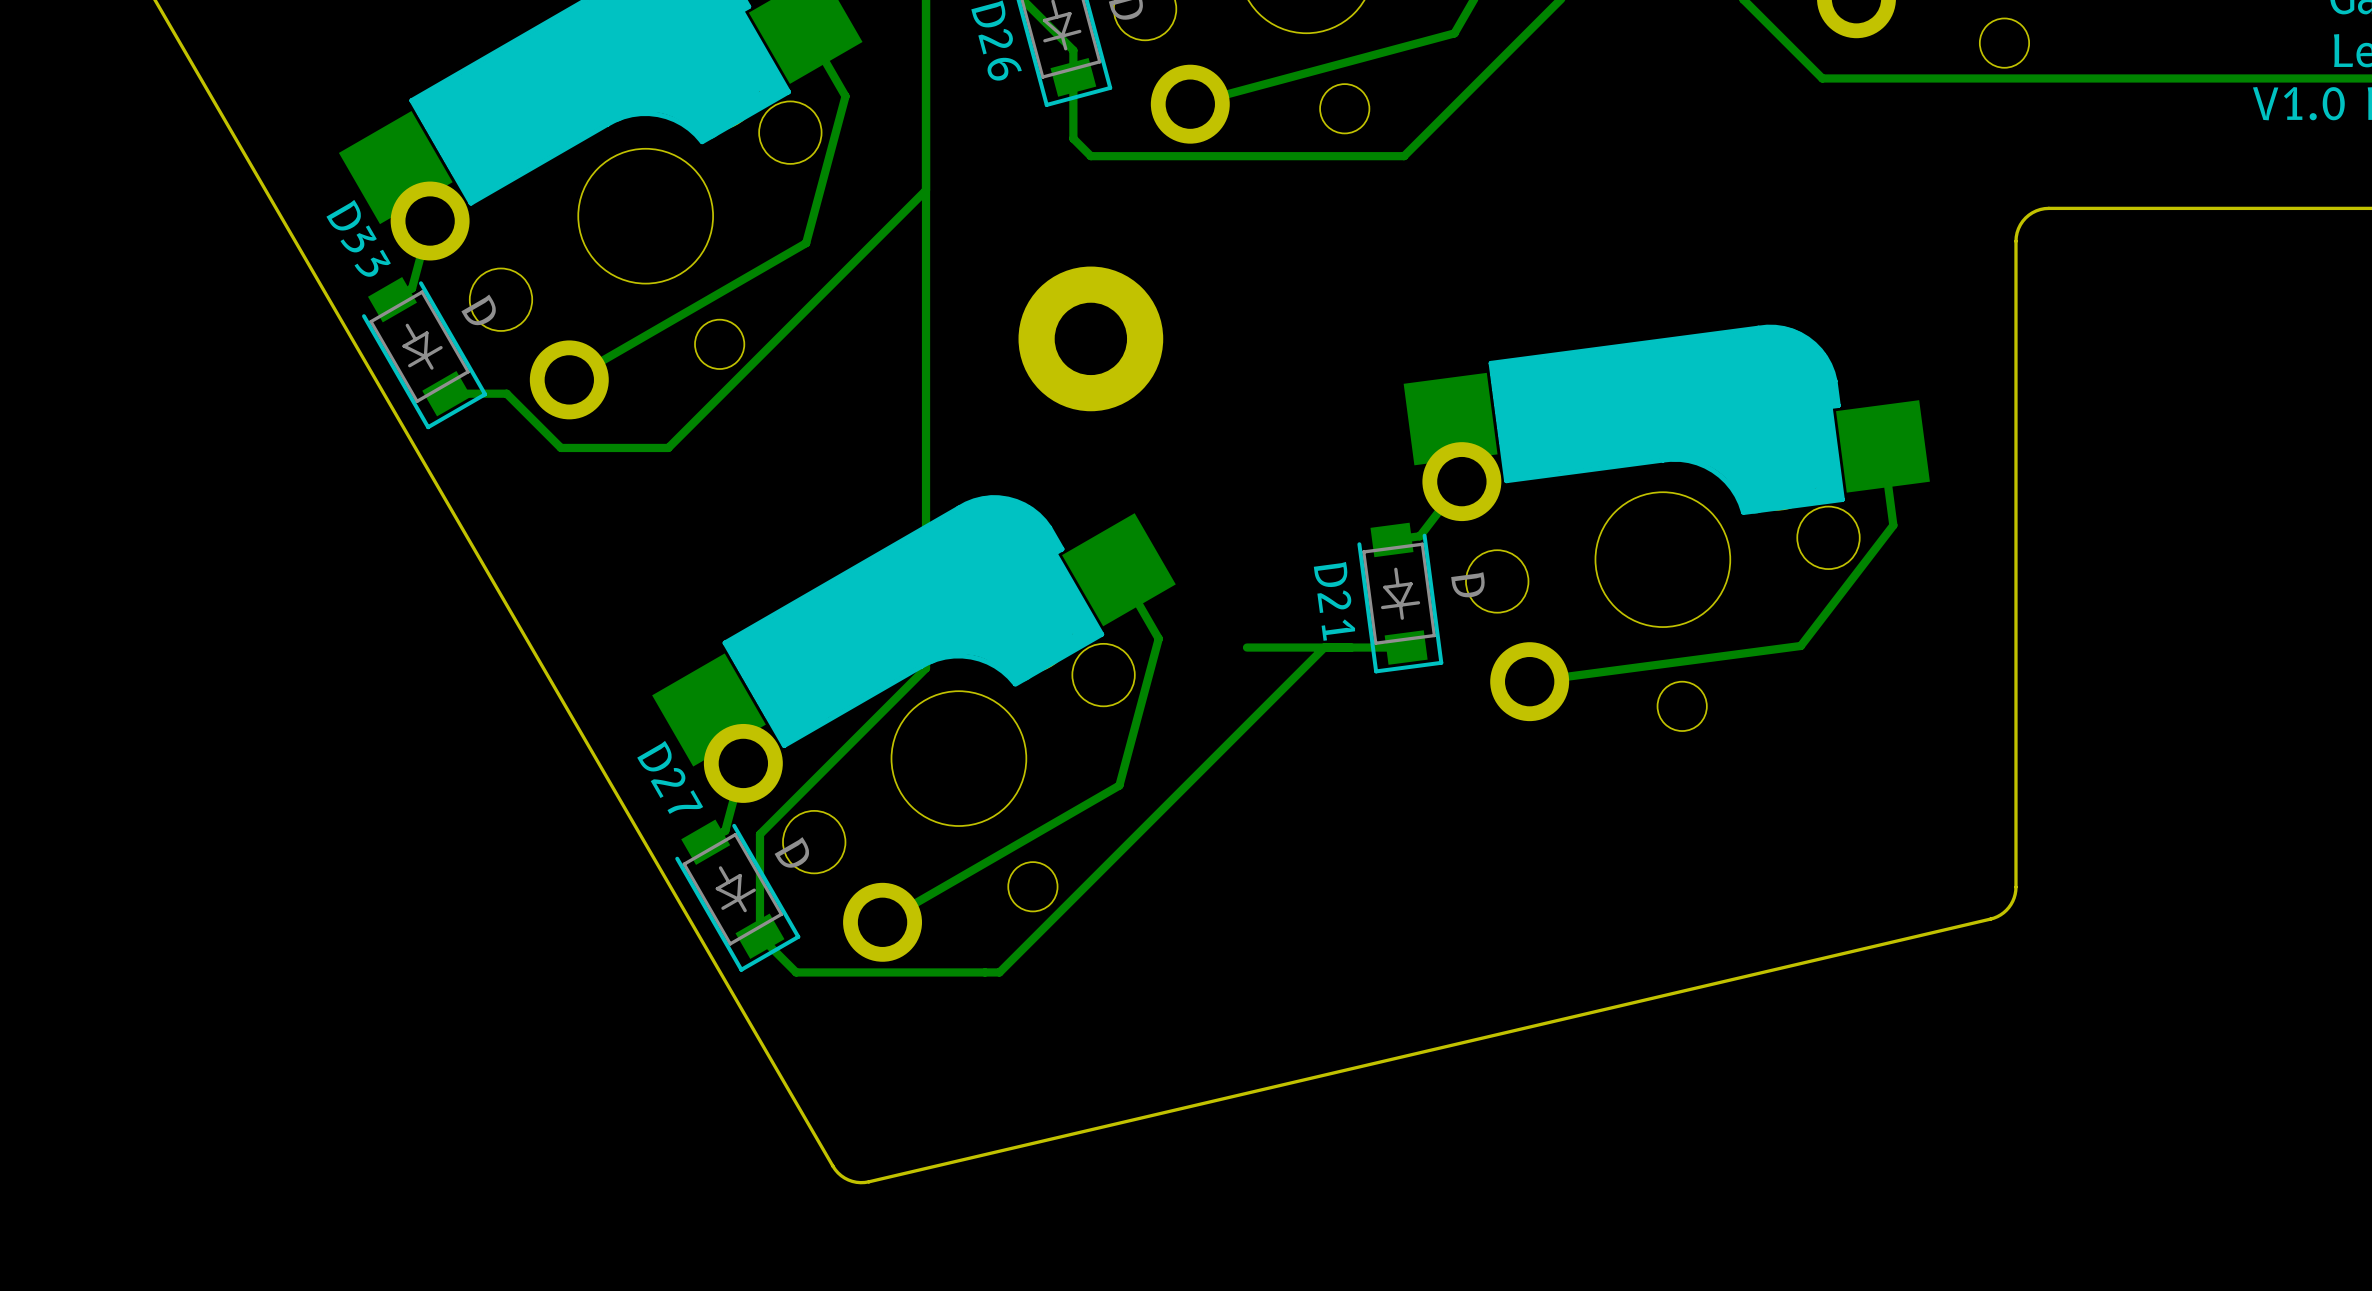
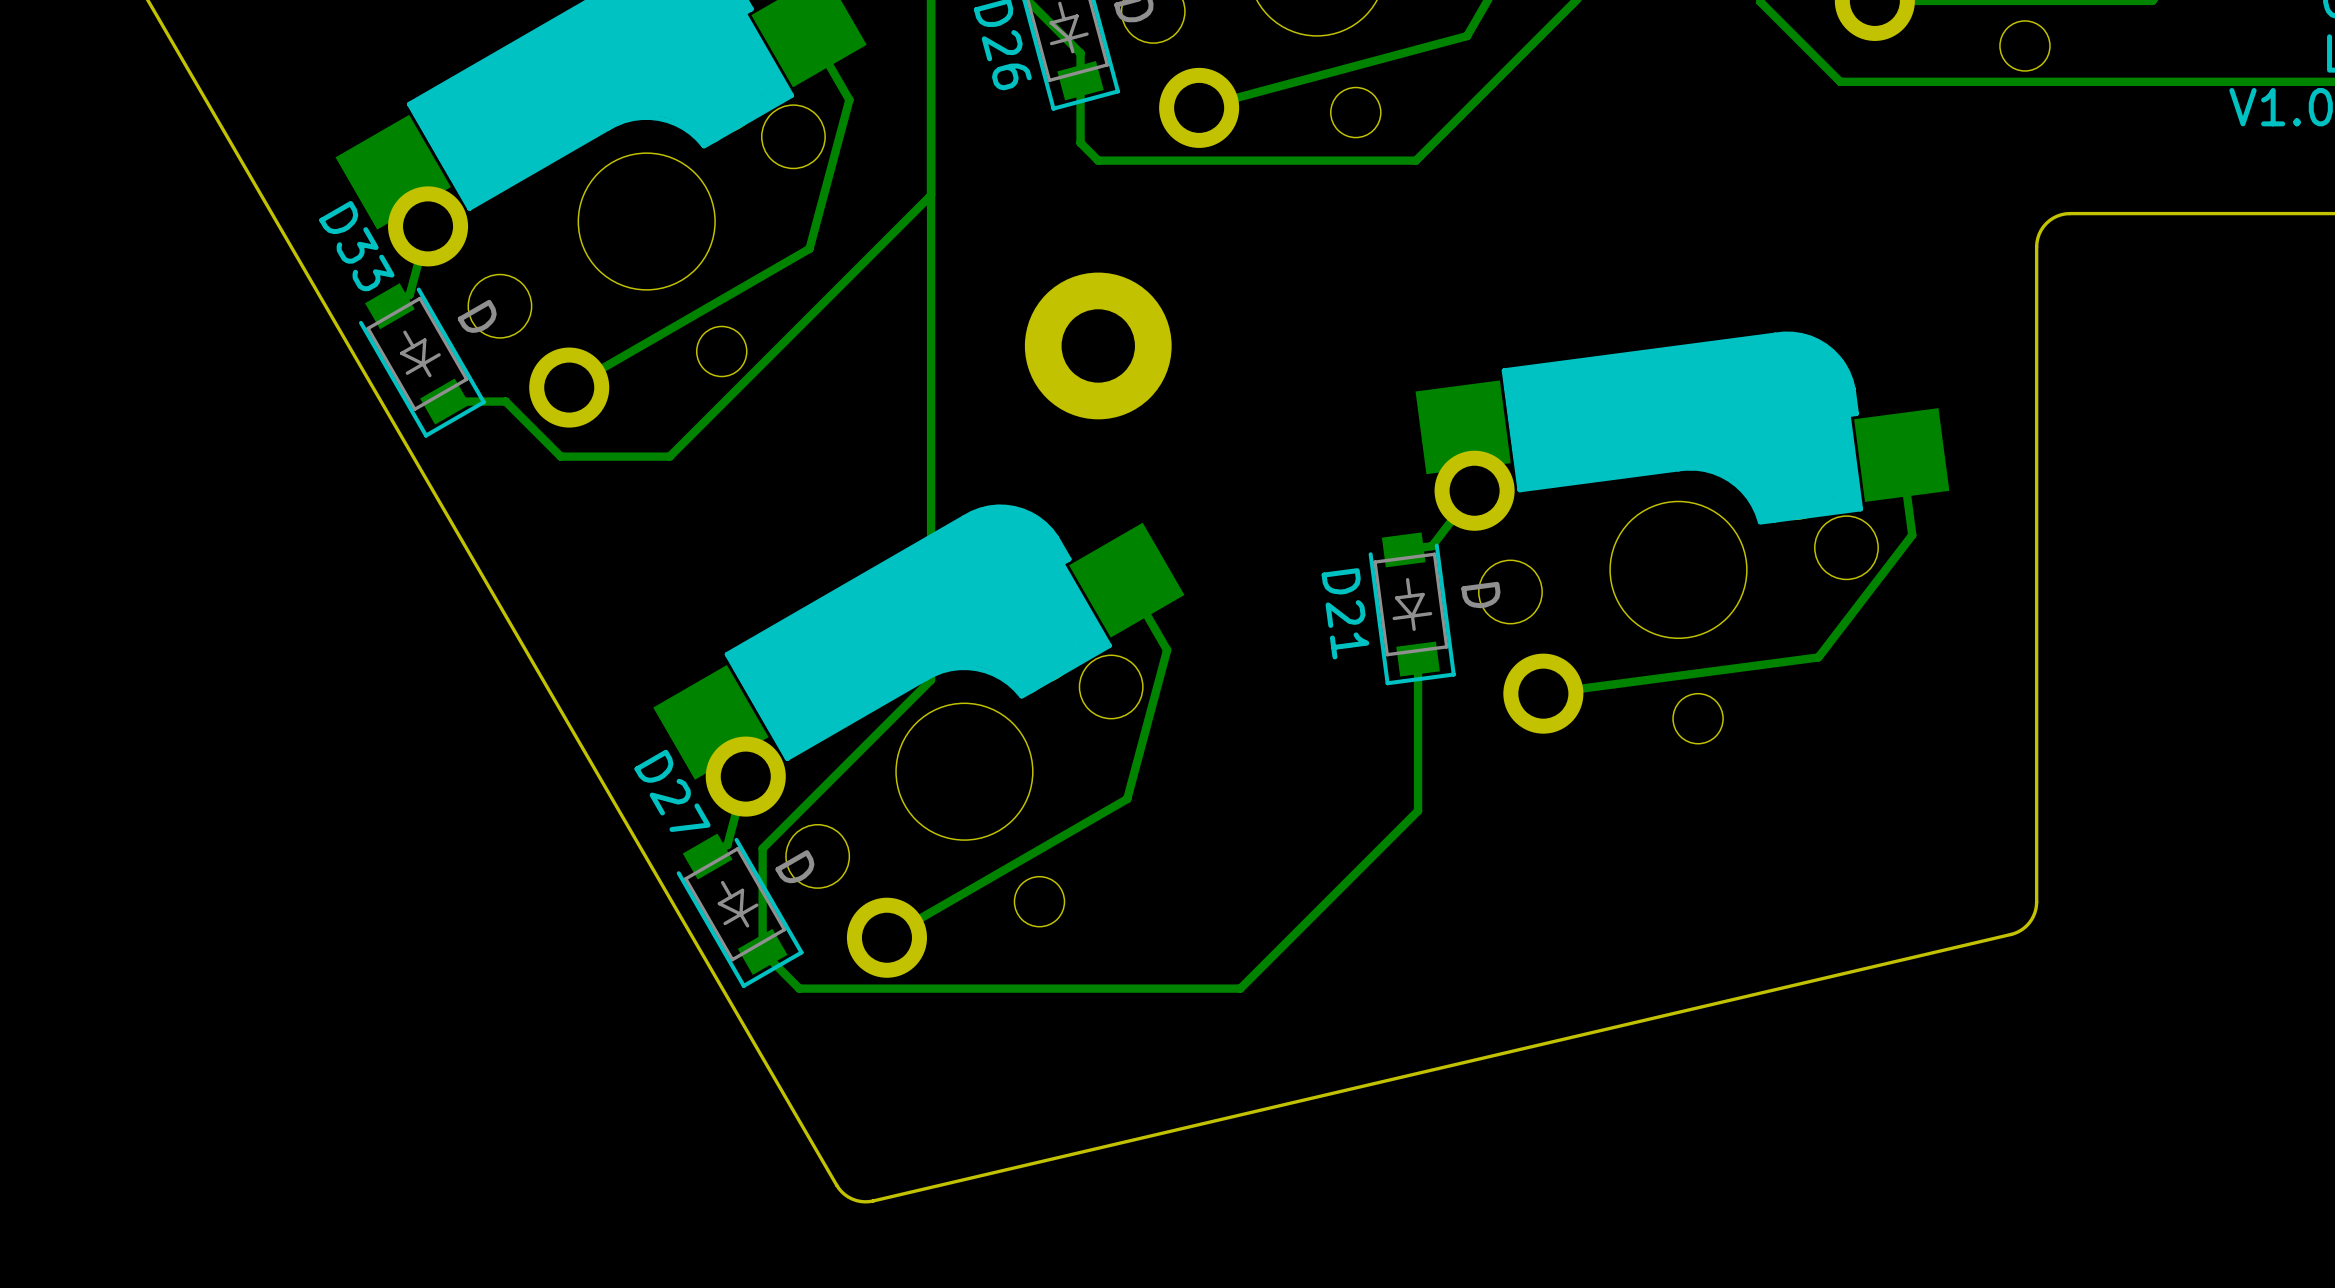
track: (1324, 647) (999, 972) -> (1418, 659) (1418, 810) (1240, 988) (1005, 988)
track: (1406, 647) (1247, 647) -> none

